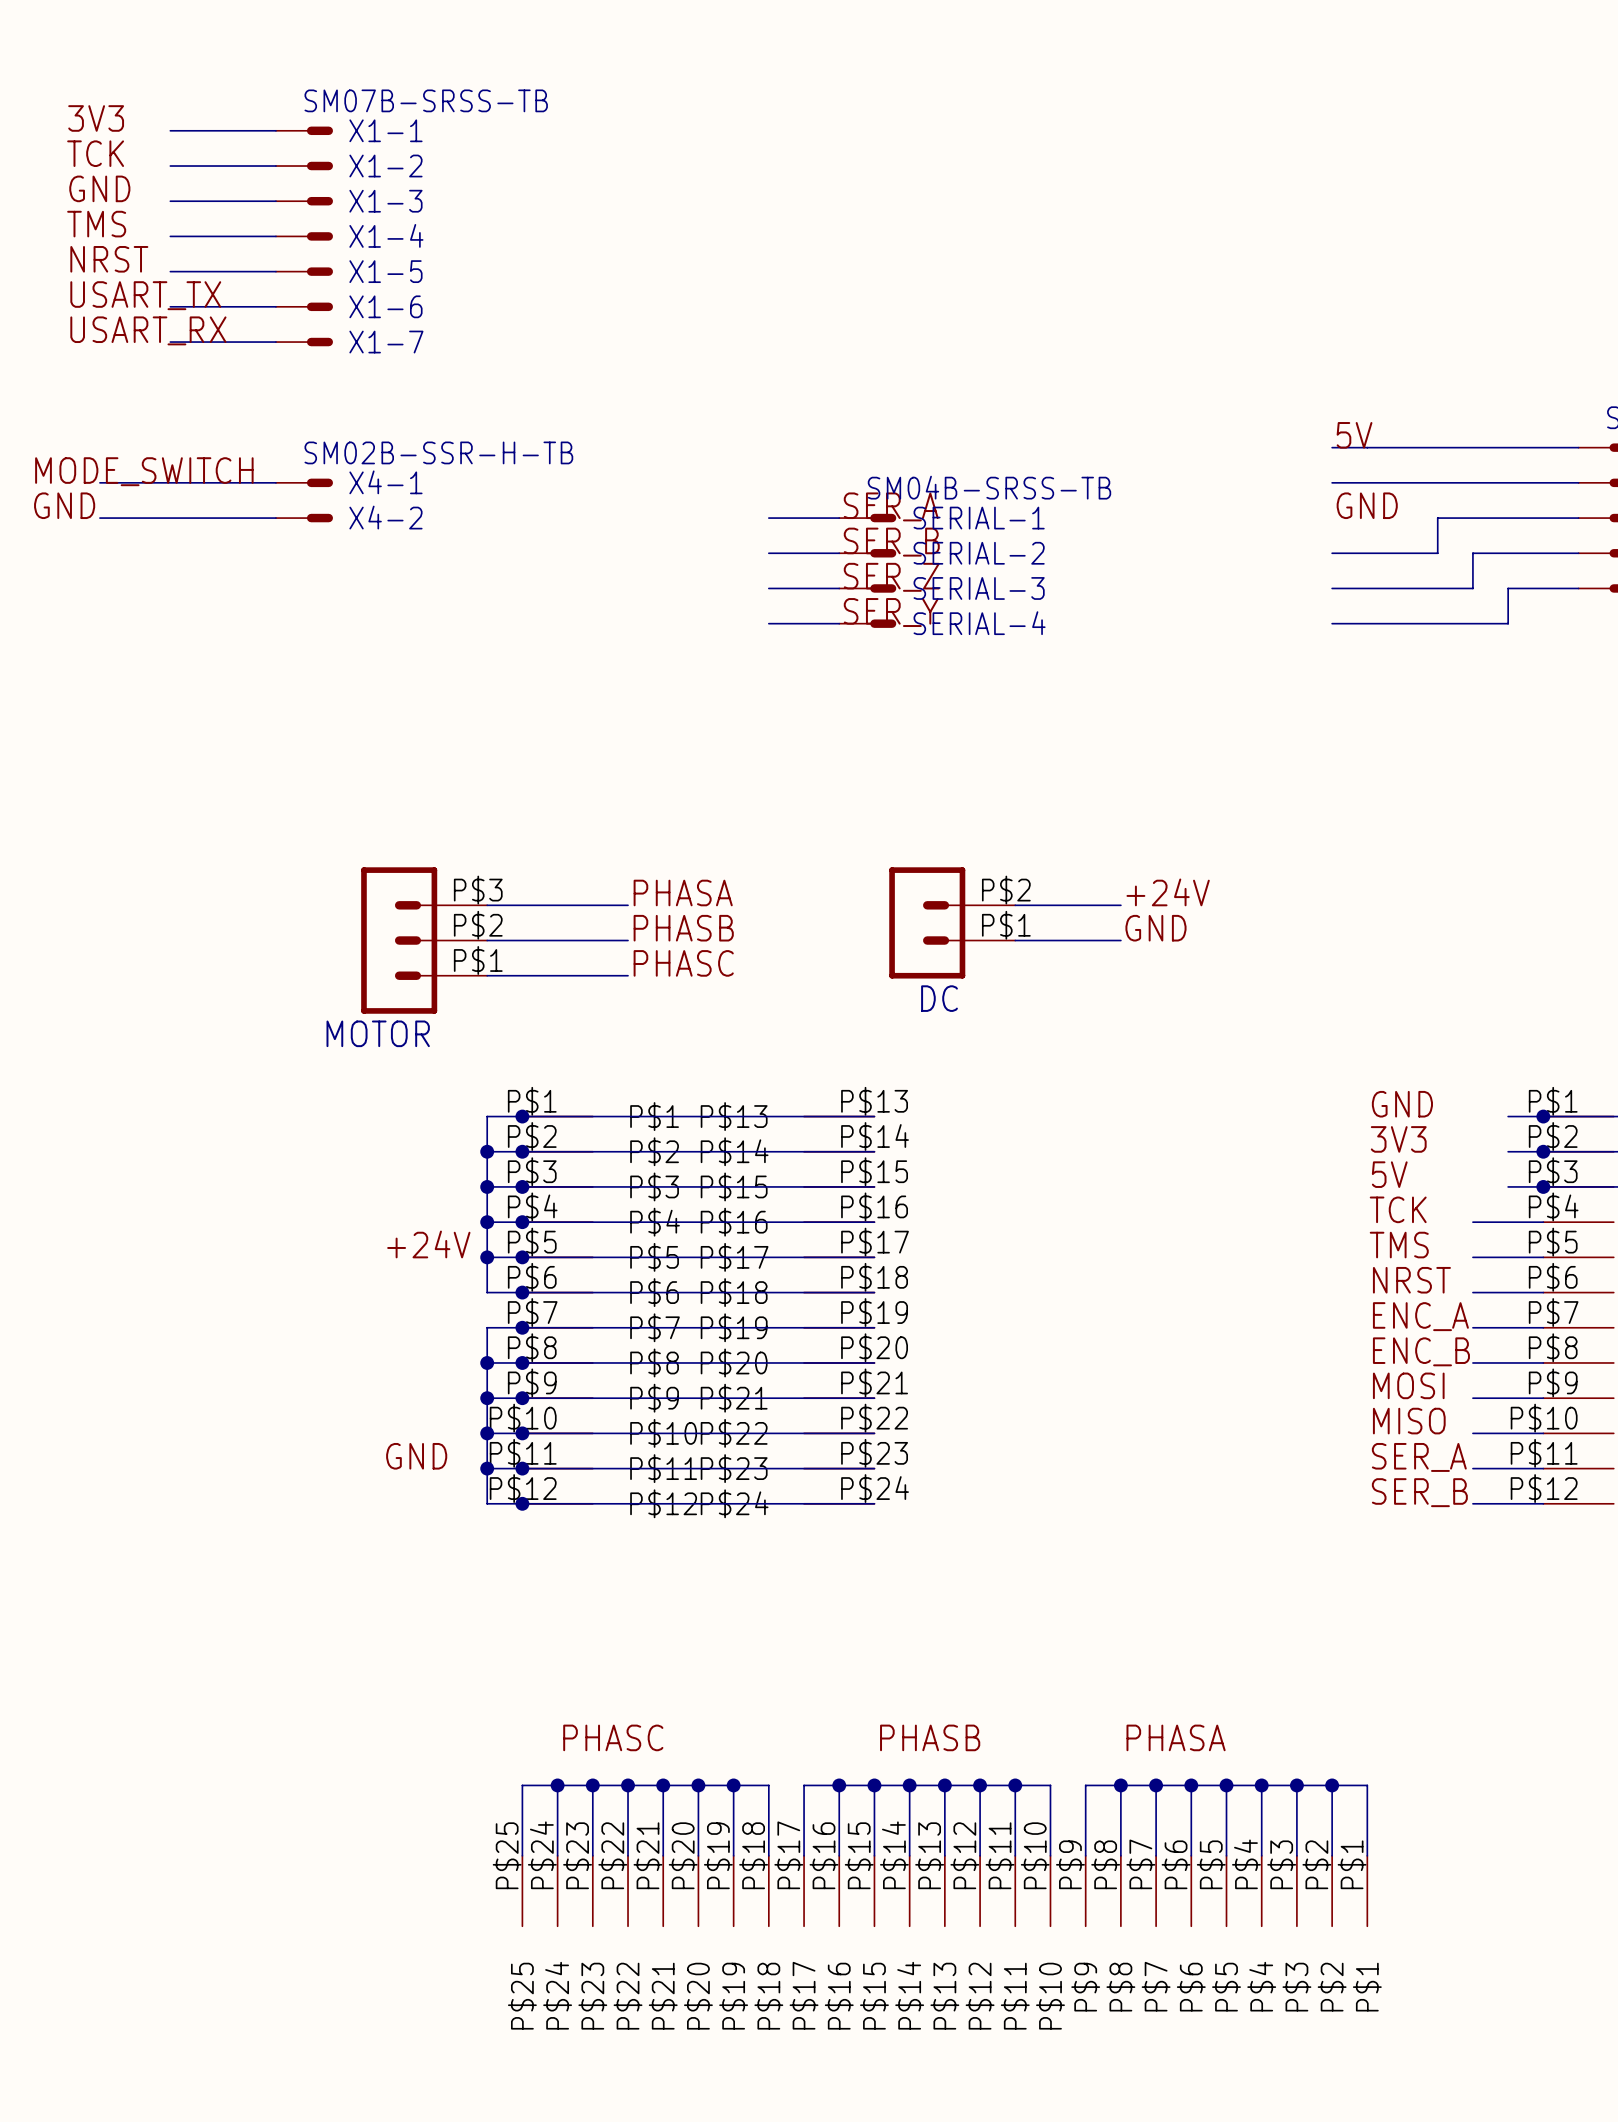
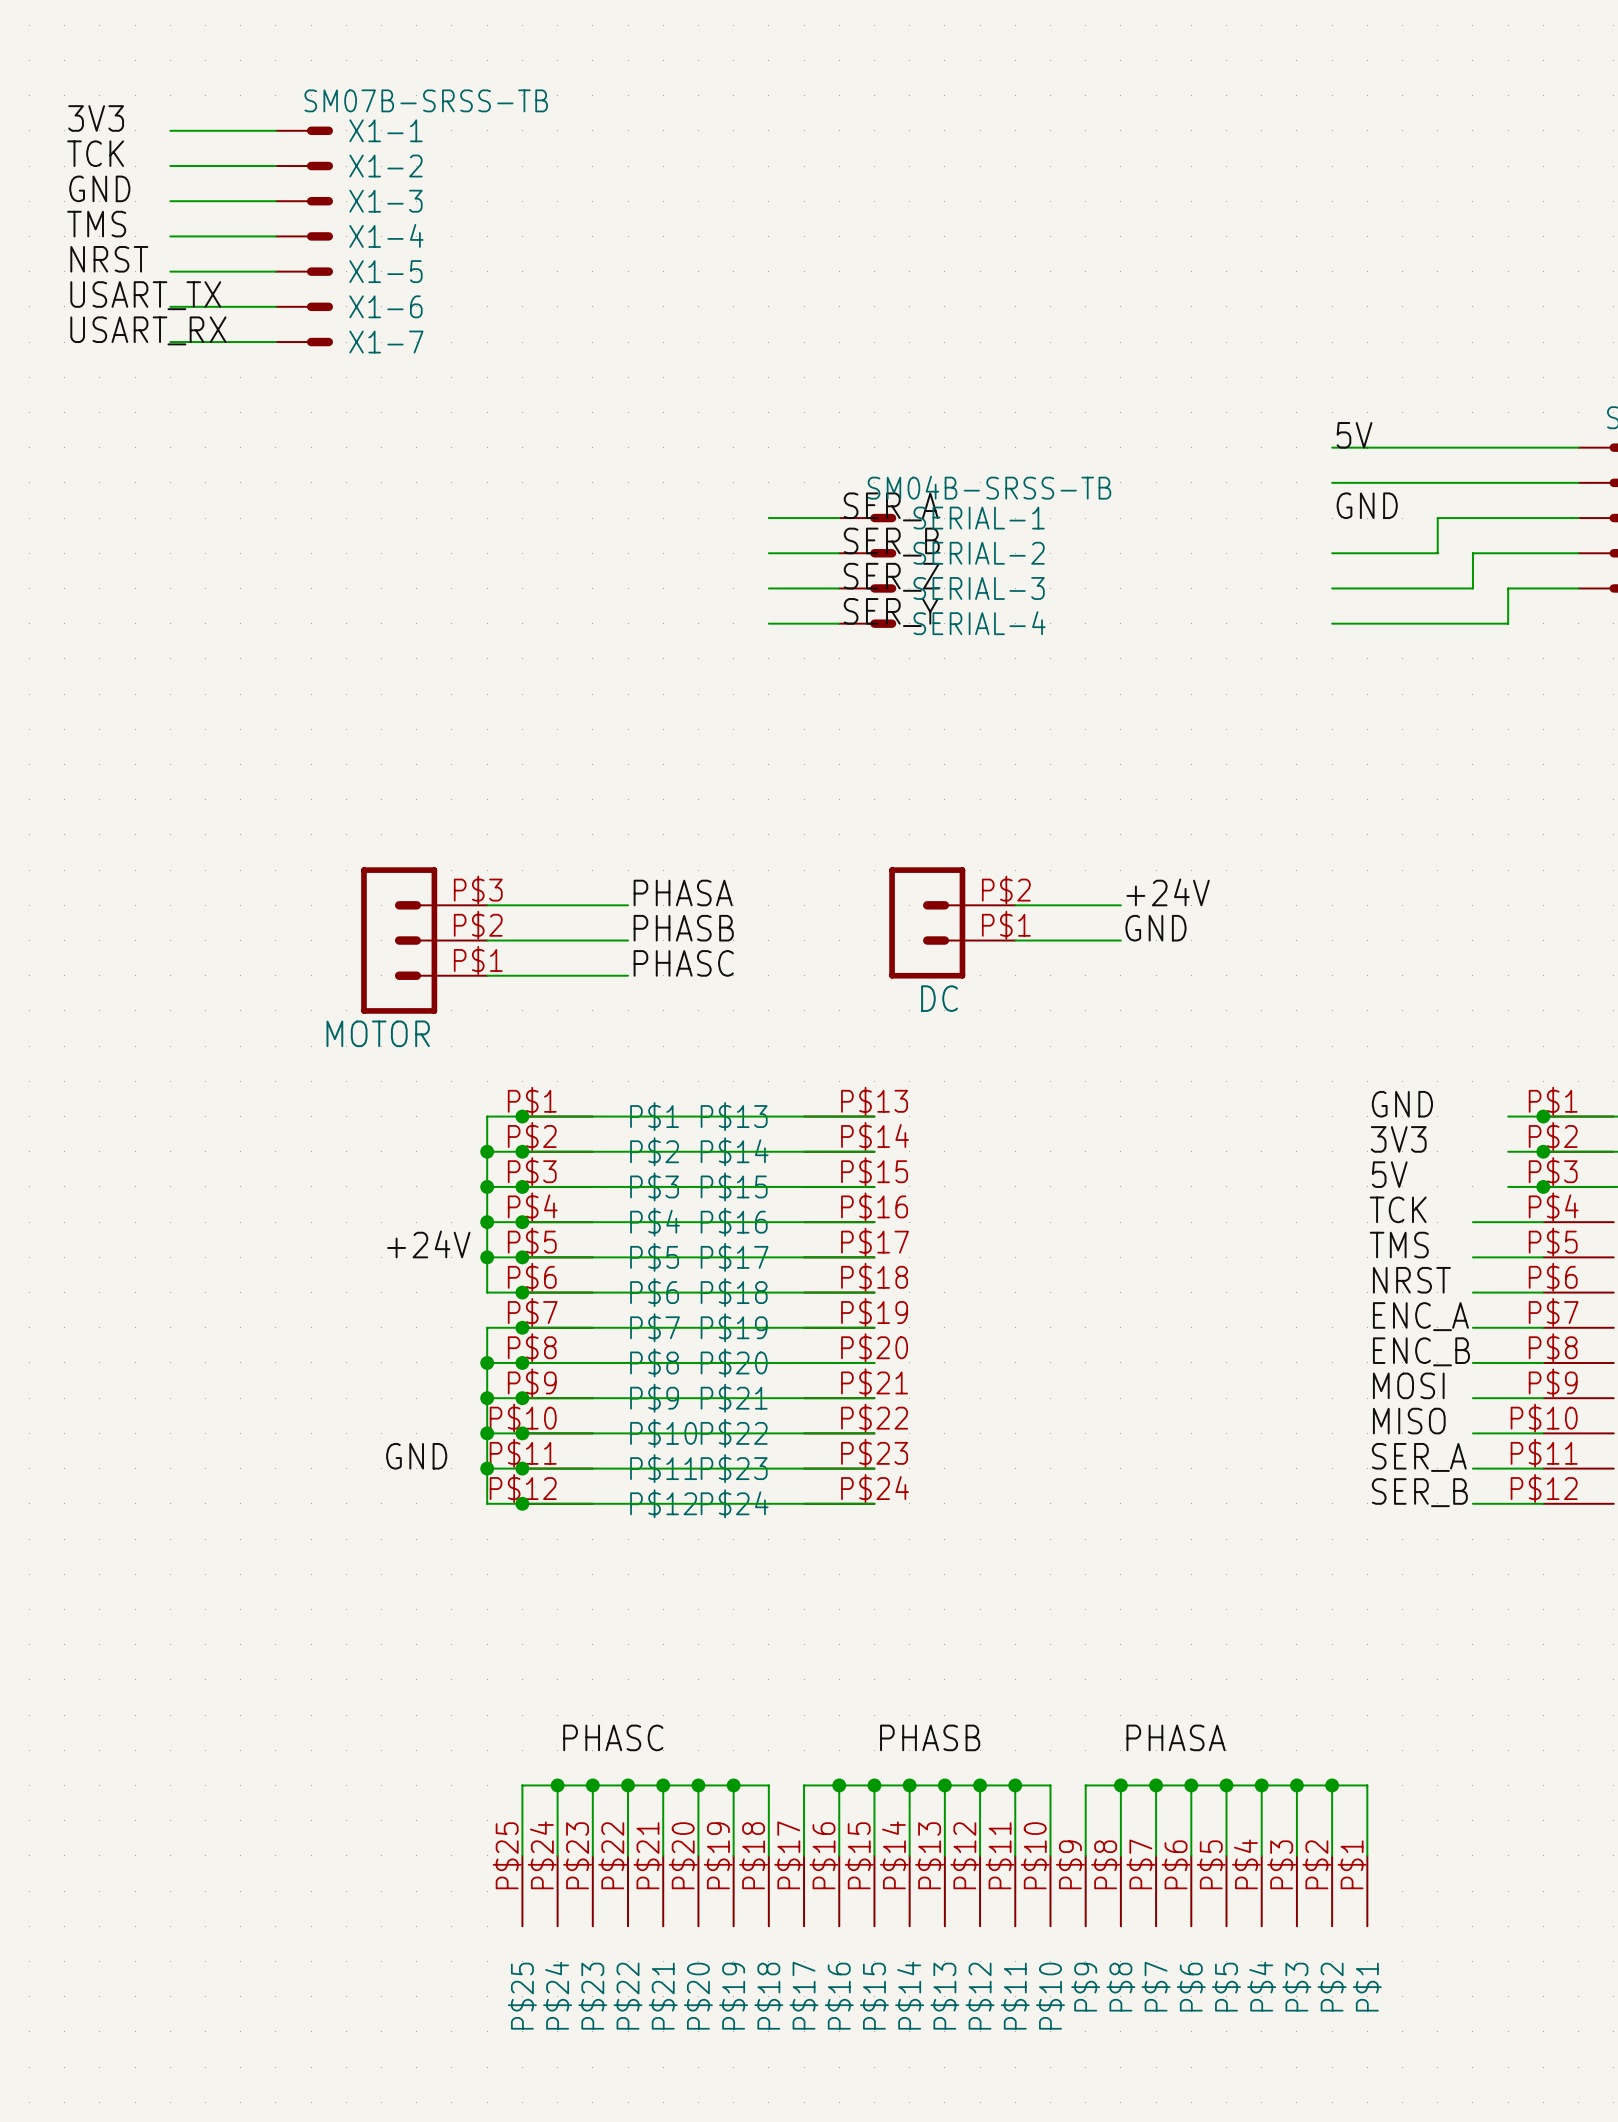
label: MODE_SWITCH (144, 471) -> none
wire: (99, 482) (275, 482) -> none
X4-1: SM02B-SSR-H-TB (304, 482) -> none
label: GND (64, 505) -> none
wire: (99, 518) (275, 518) -> none
X4-2: (304, 518) -> none

